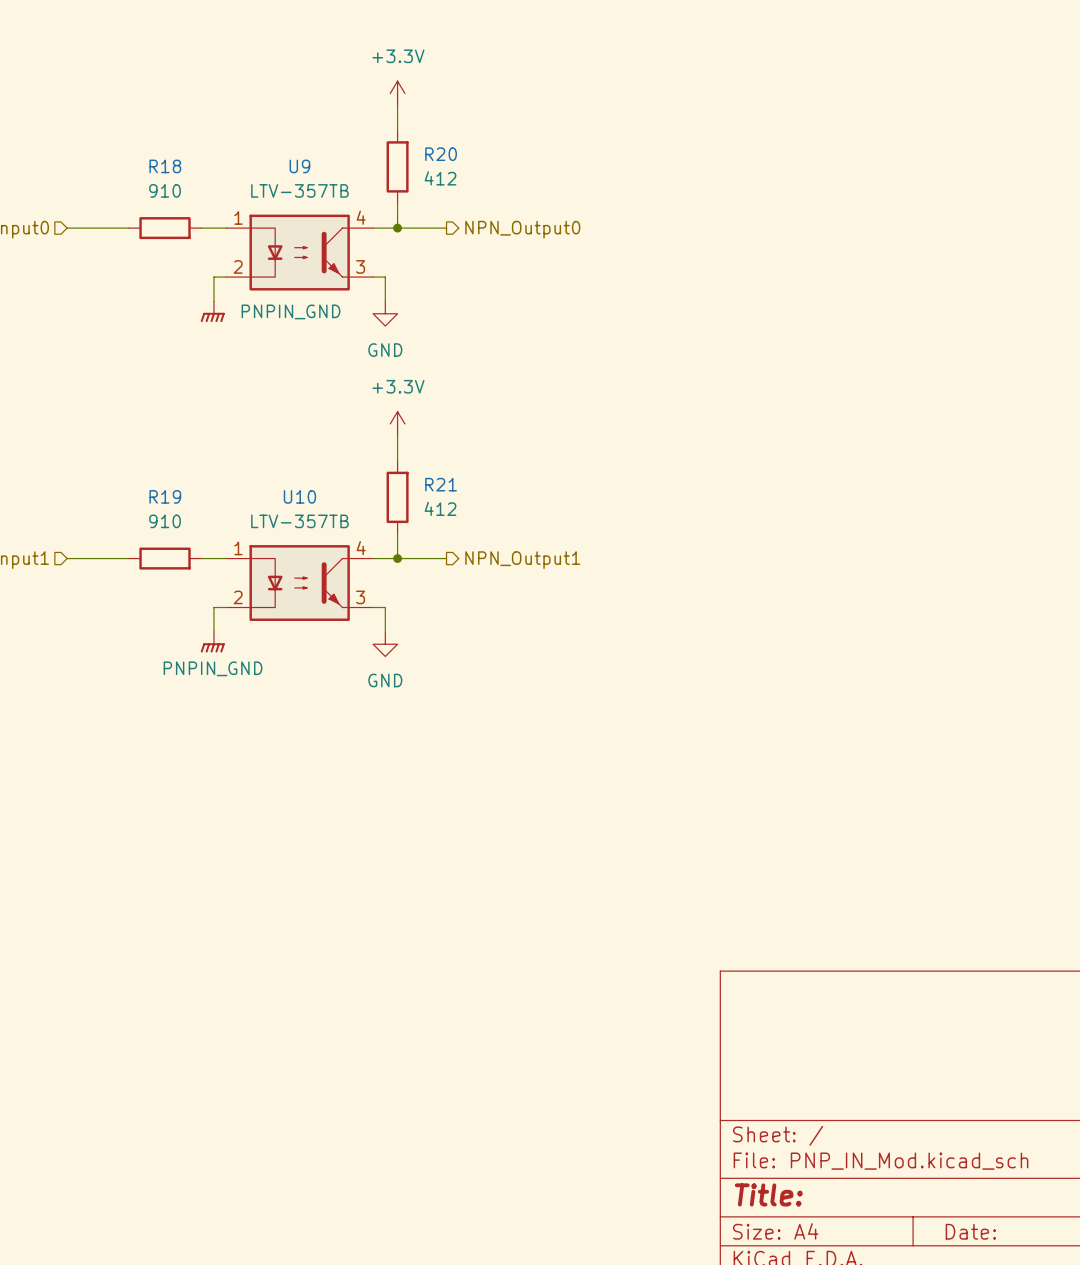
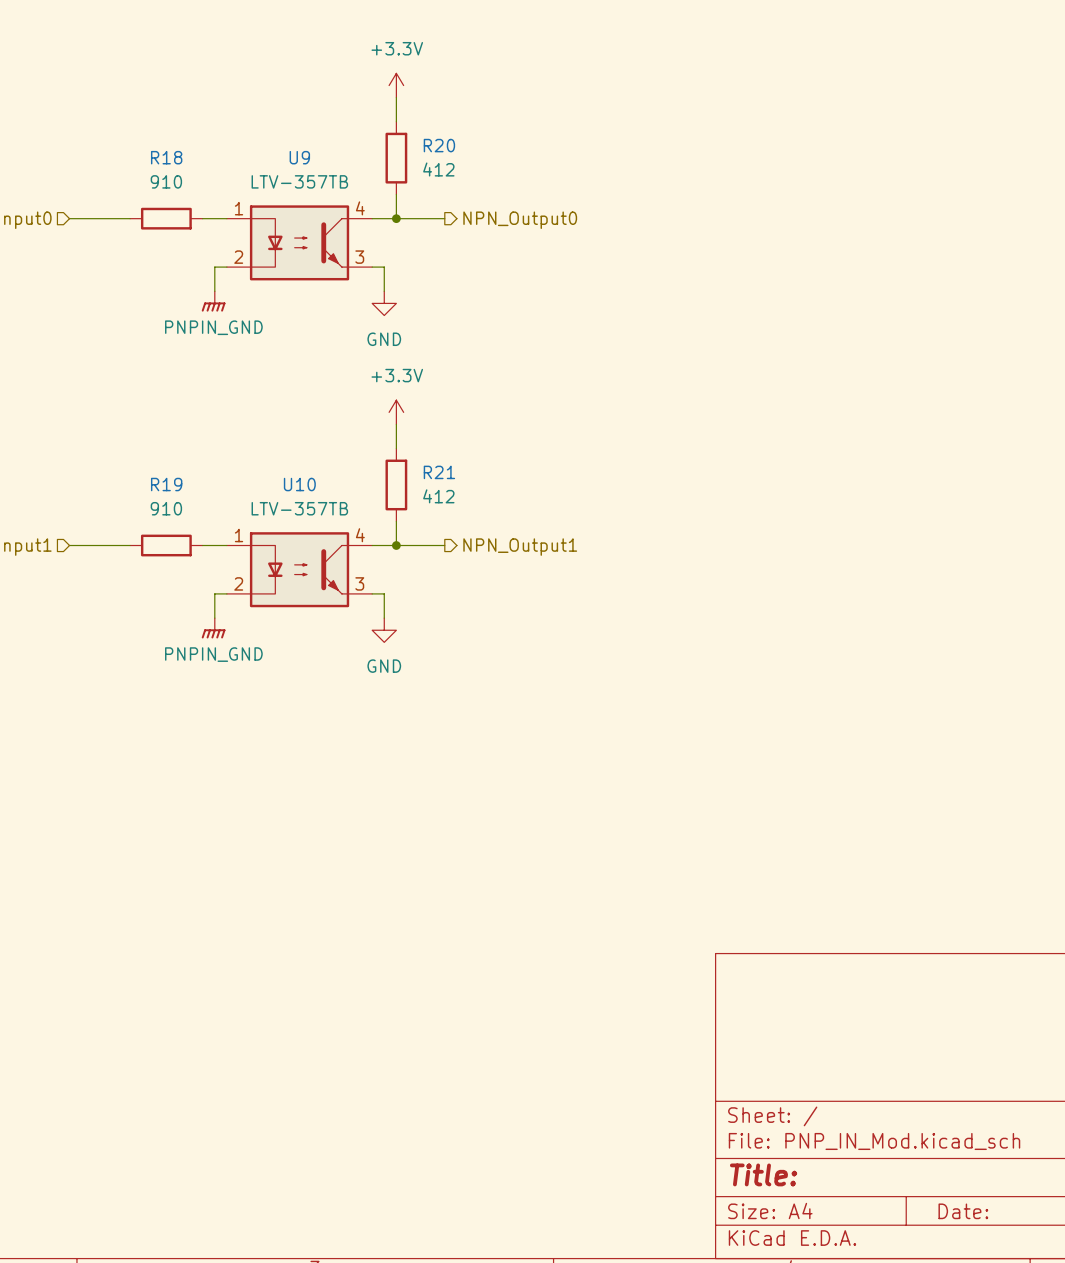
power symbol text position: PNPIN_GND (291, 311) -> PNPIN_GND (213, 327)

